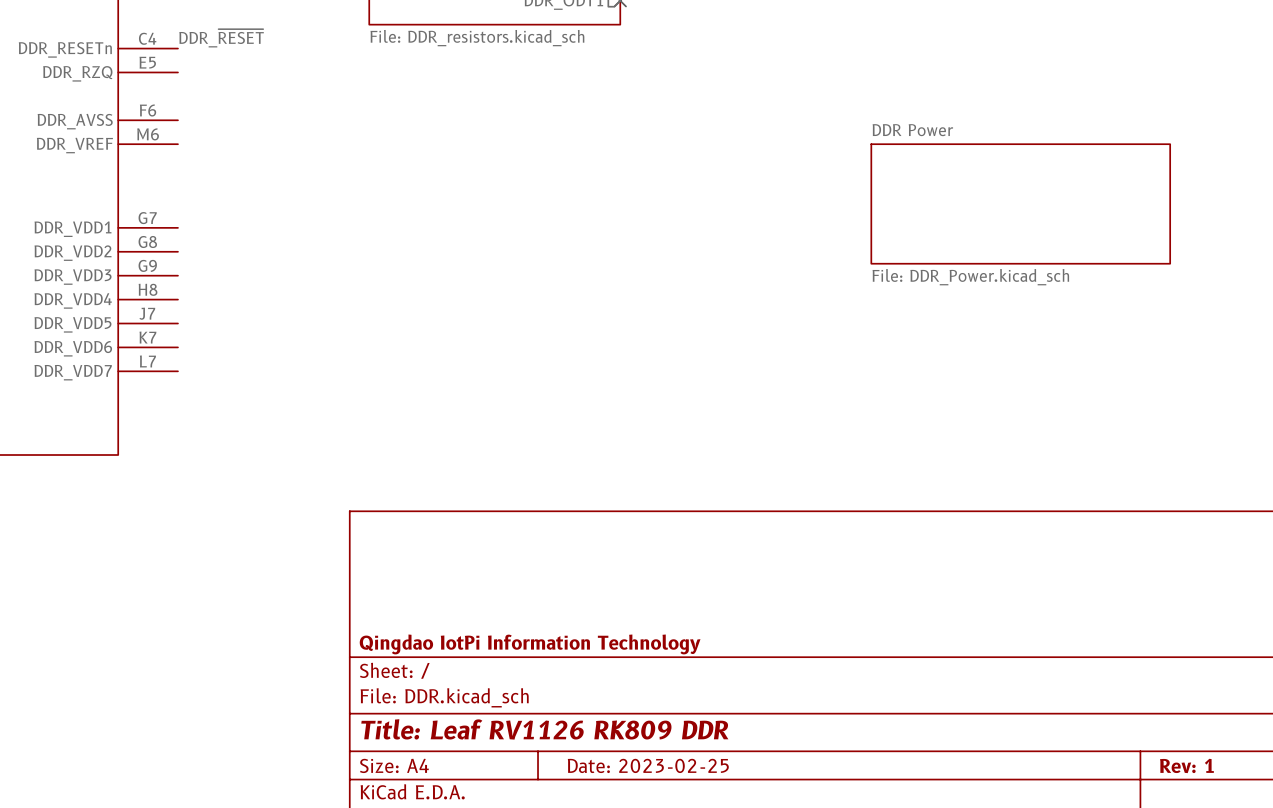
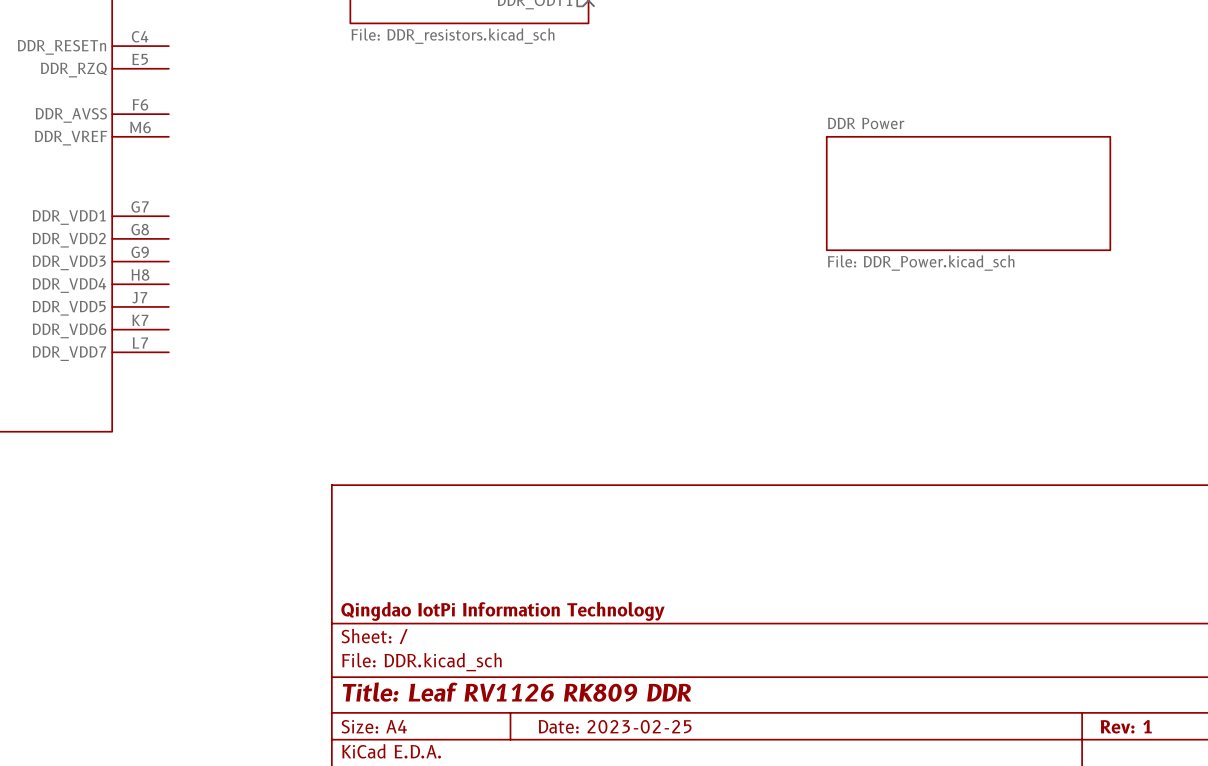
label: DDR_~{RESET} (221, 38) -> none

